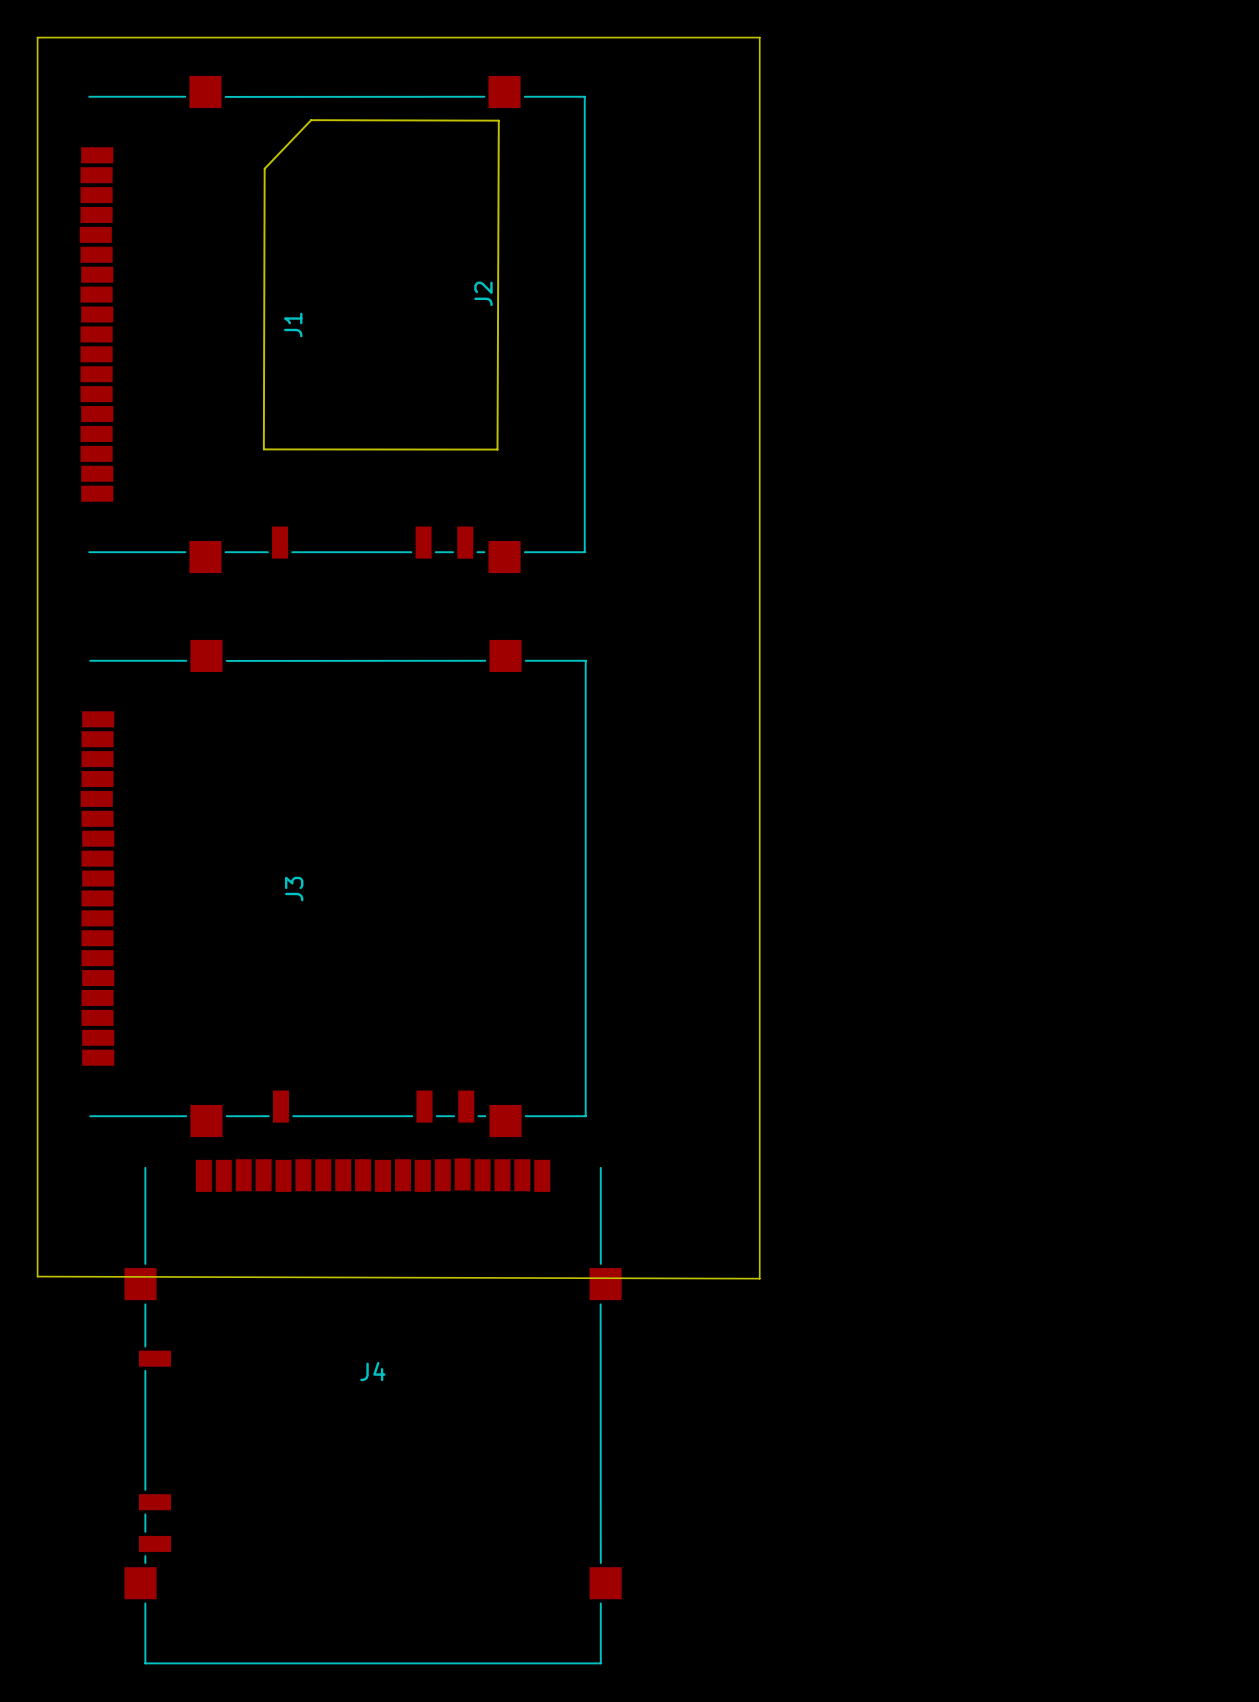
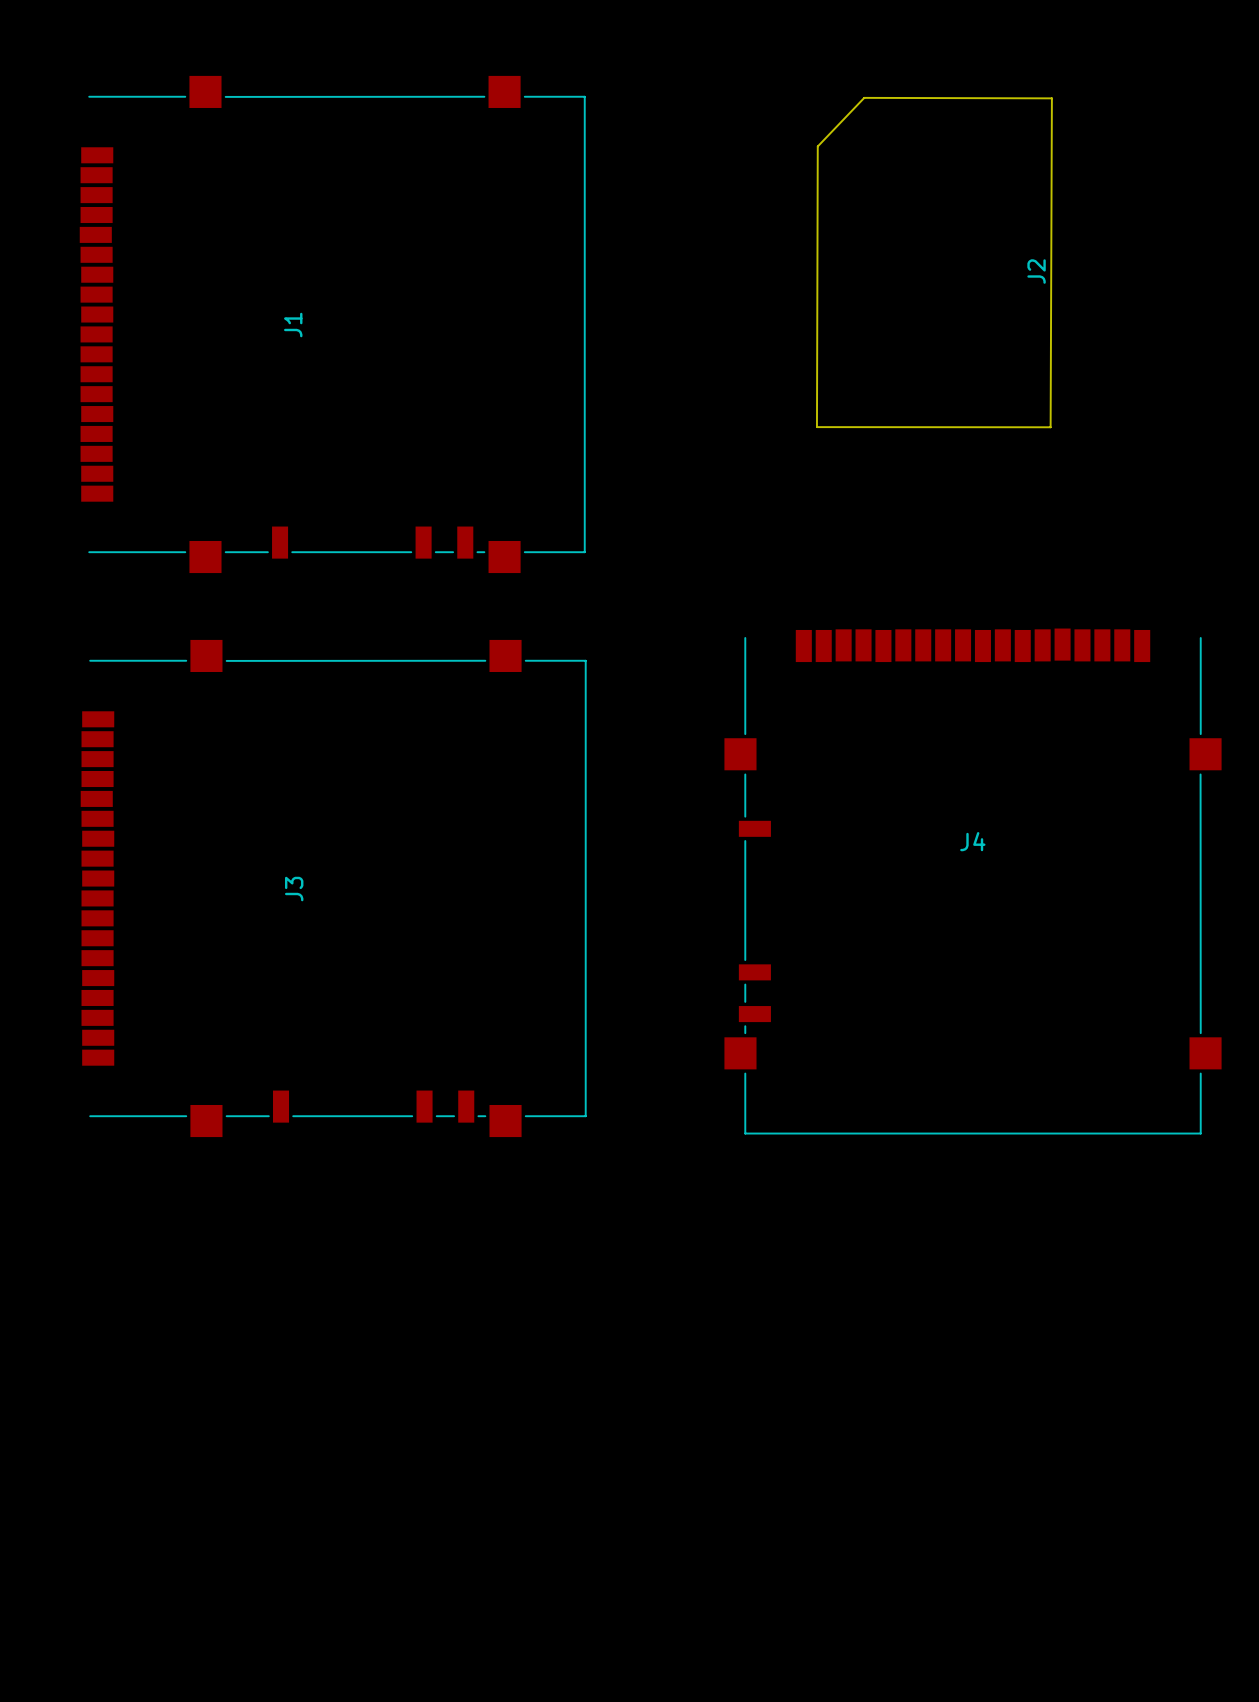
board edge: (37, 37) (37, 1276) (759, 1278) (759, 37) (37, 37) -> none
J2 position: (381, 284) -> (934, 262)
J4 position: (373, 1411) -> (973, 881)

